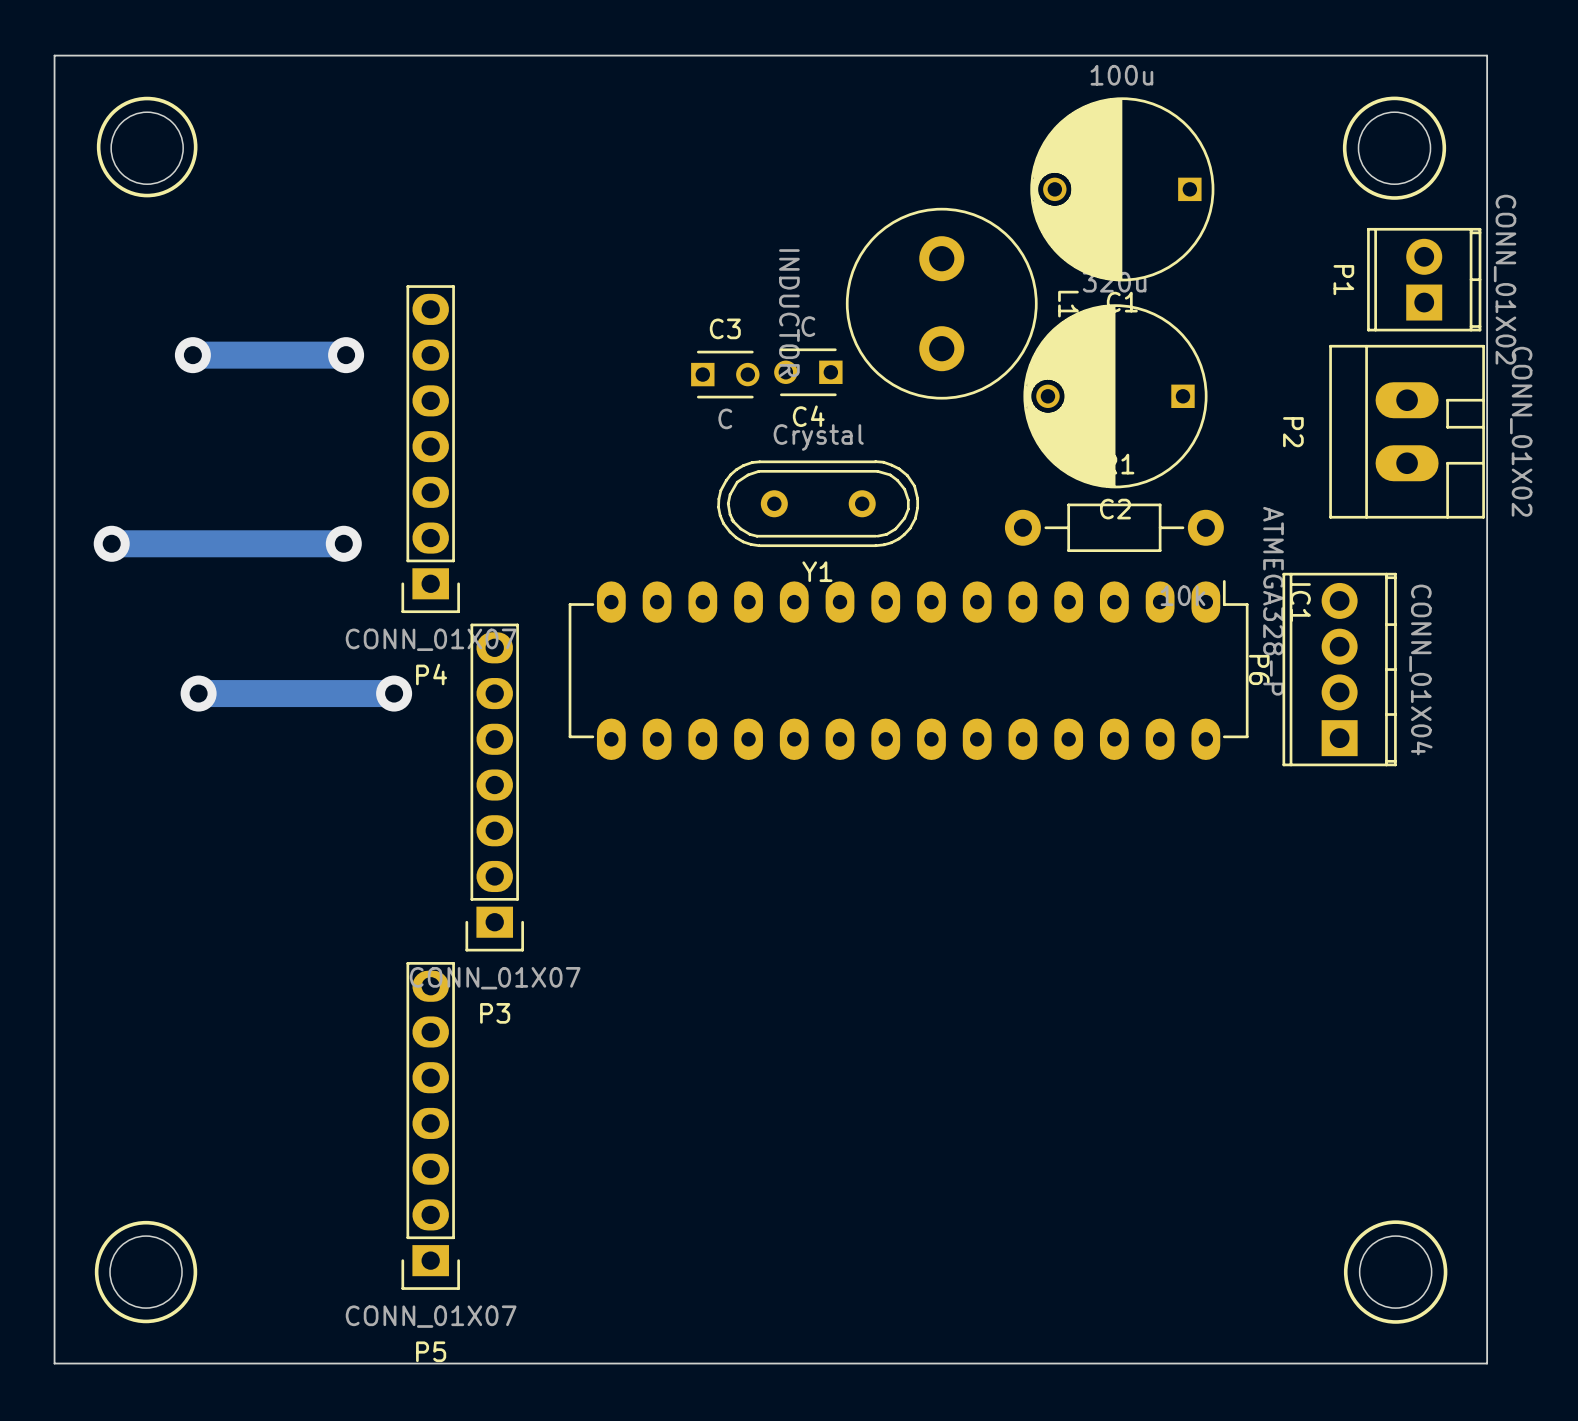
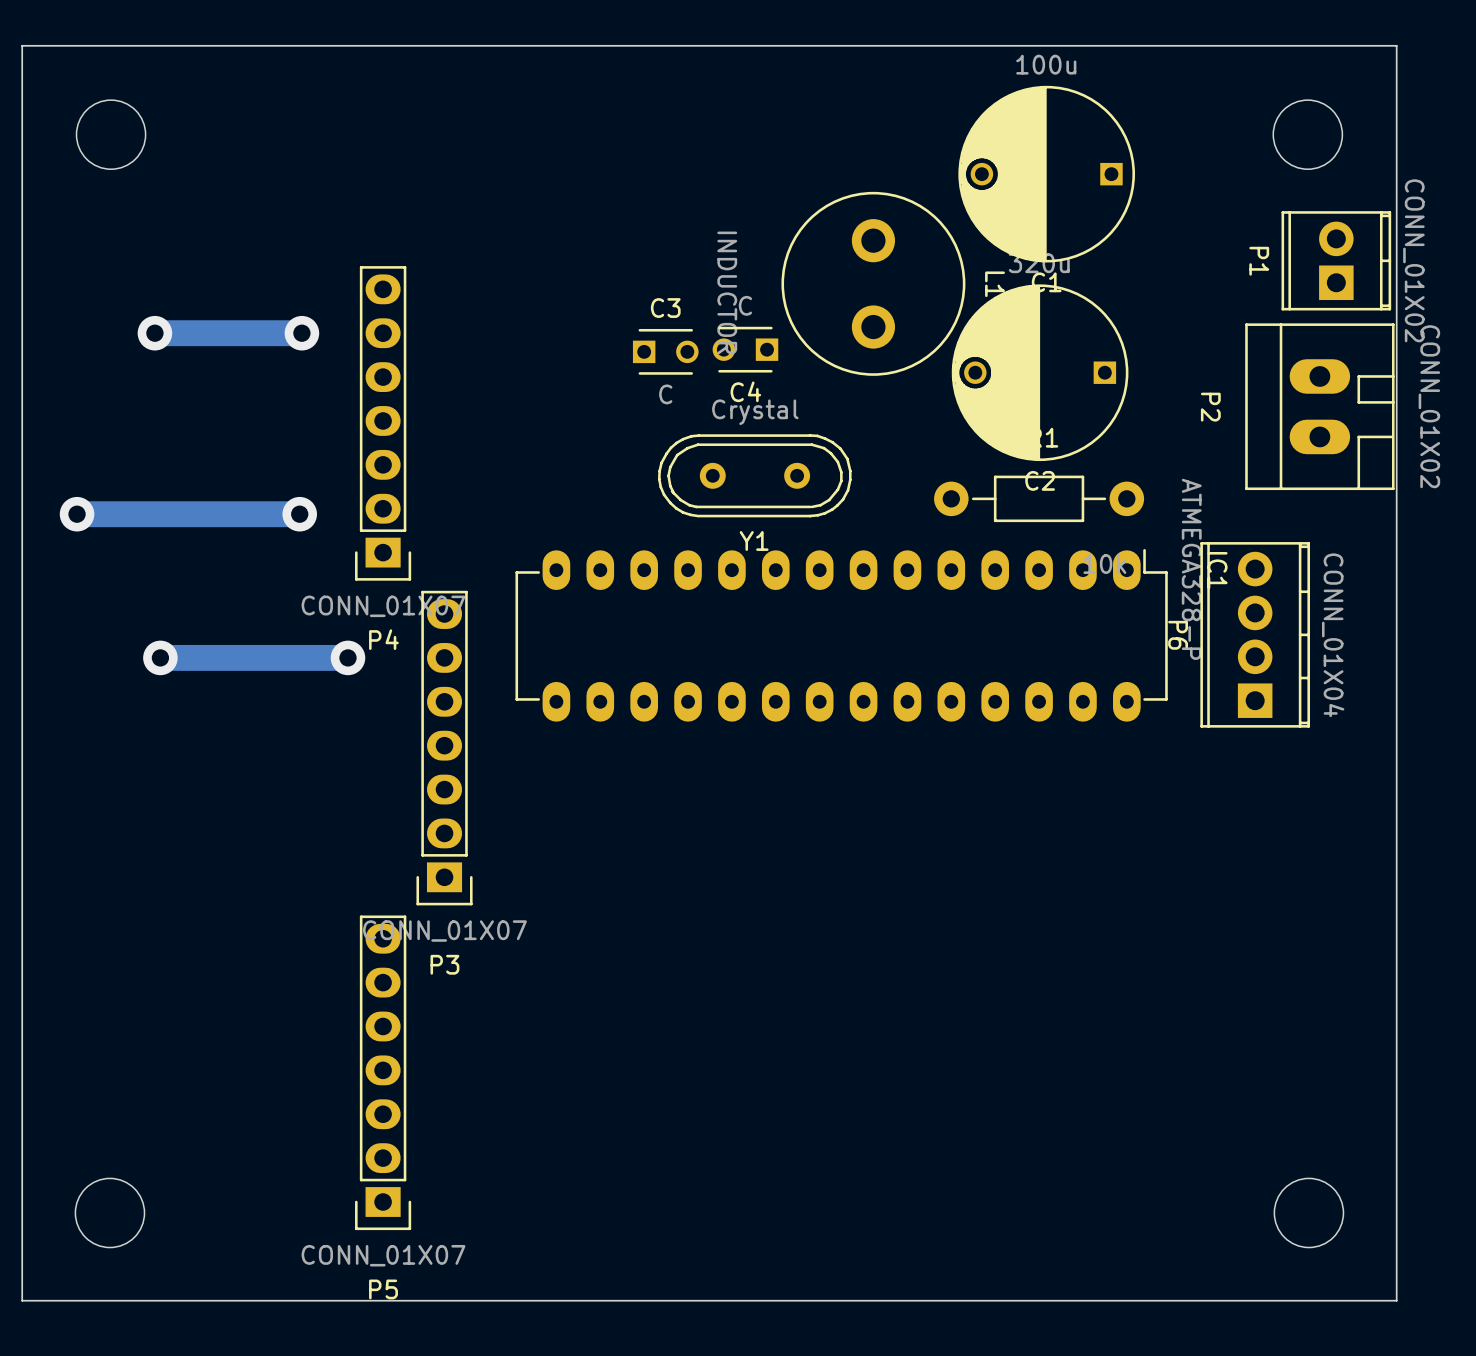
drawing: [96, 96, 198, 198] -> none
drawing: [1342, 96, 1447, 200] -> none
drawing: [94, 1220, 198, 1324] -> none
drawing: [1343, 1220, 1448, 1324] -> none

